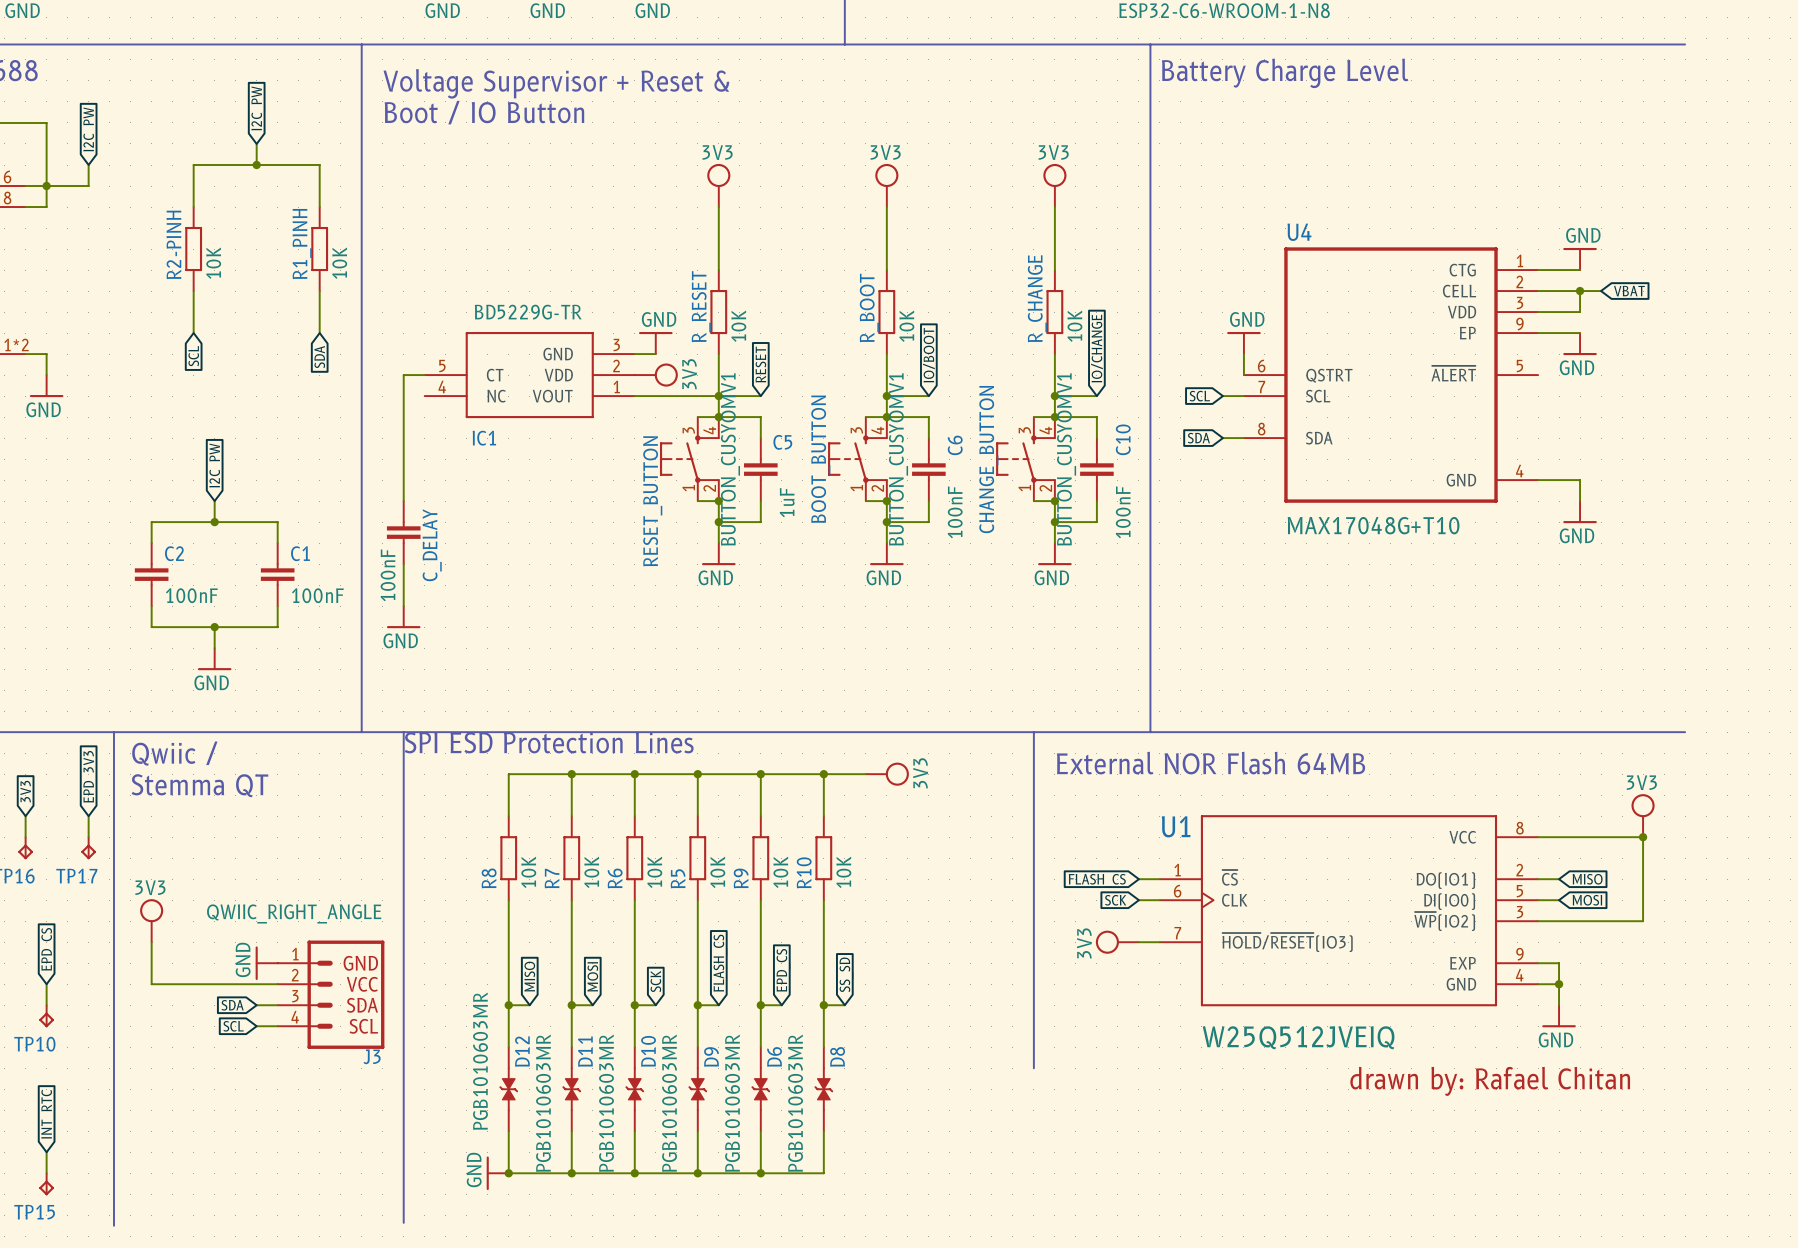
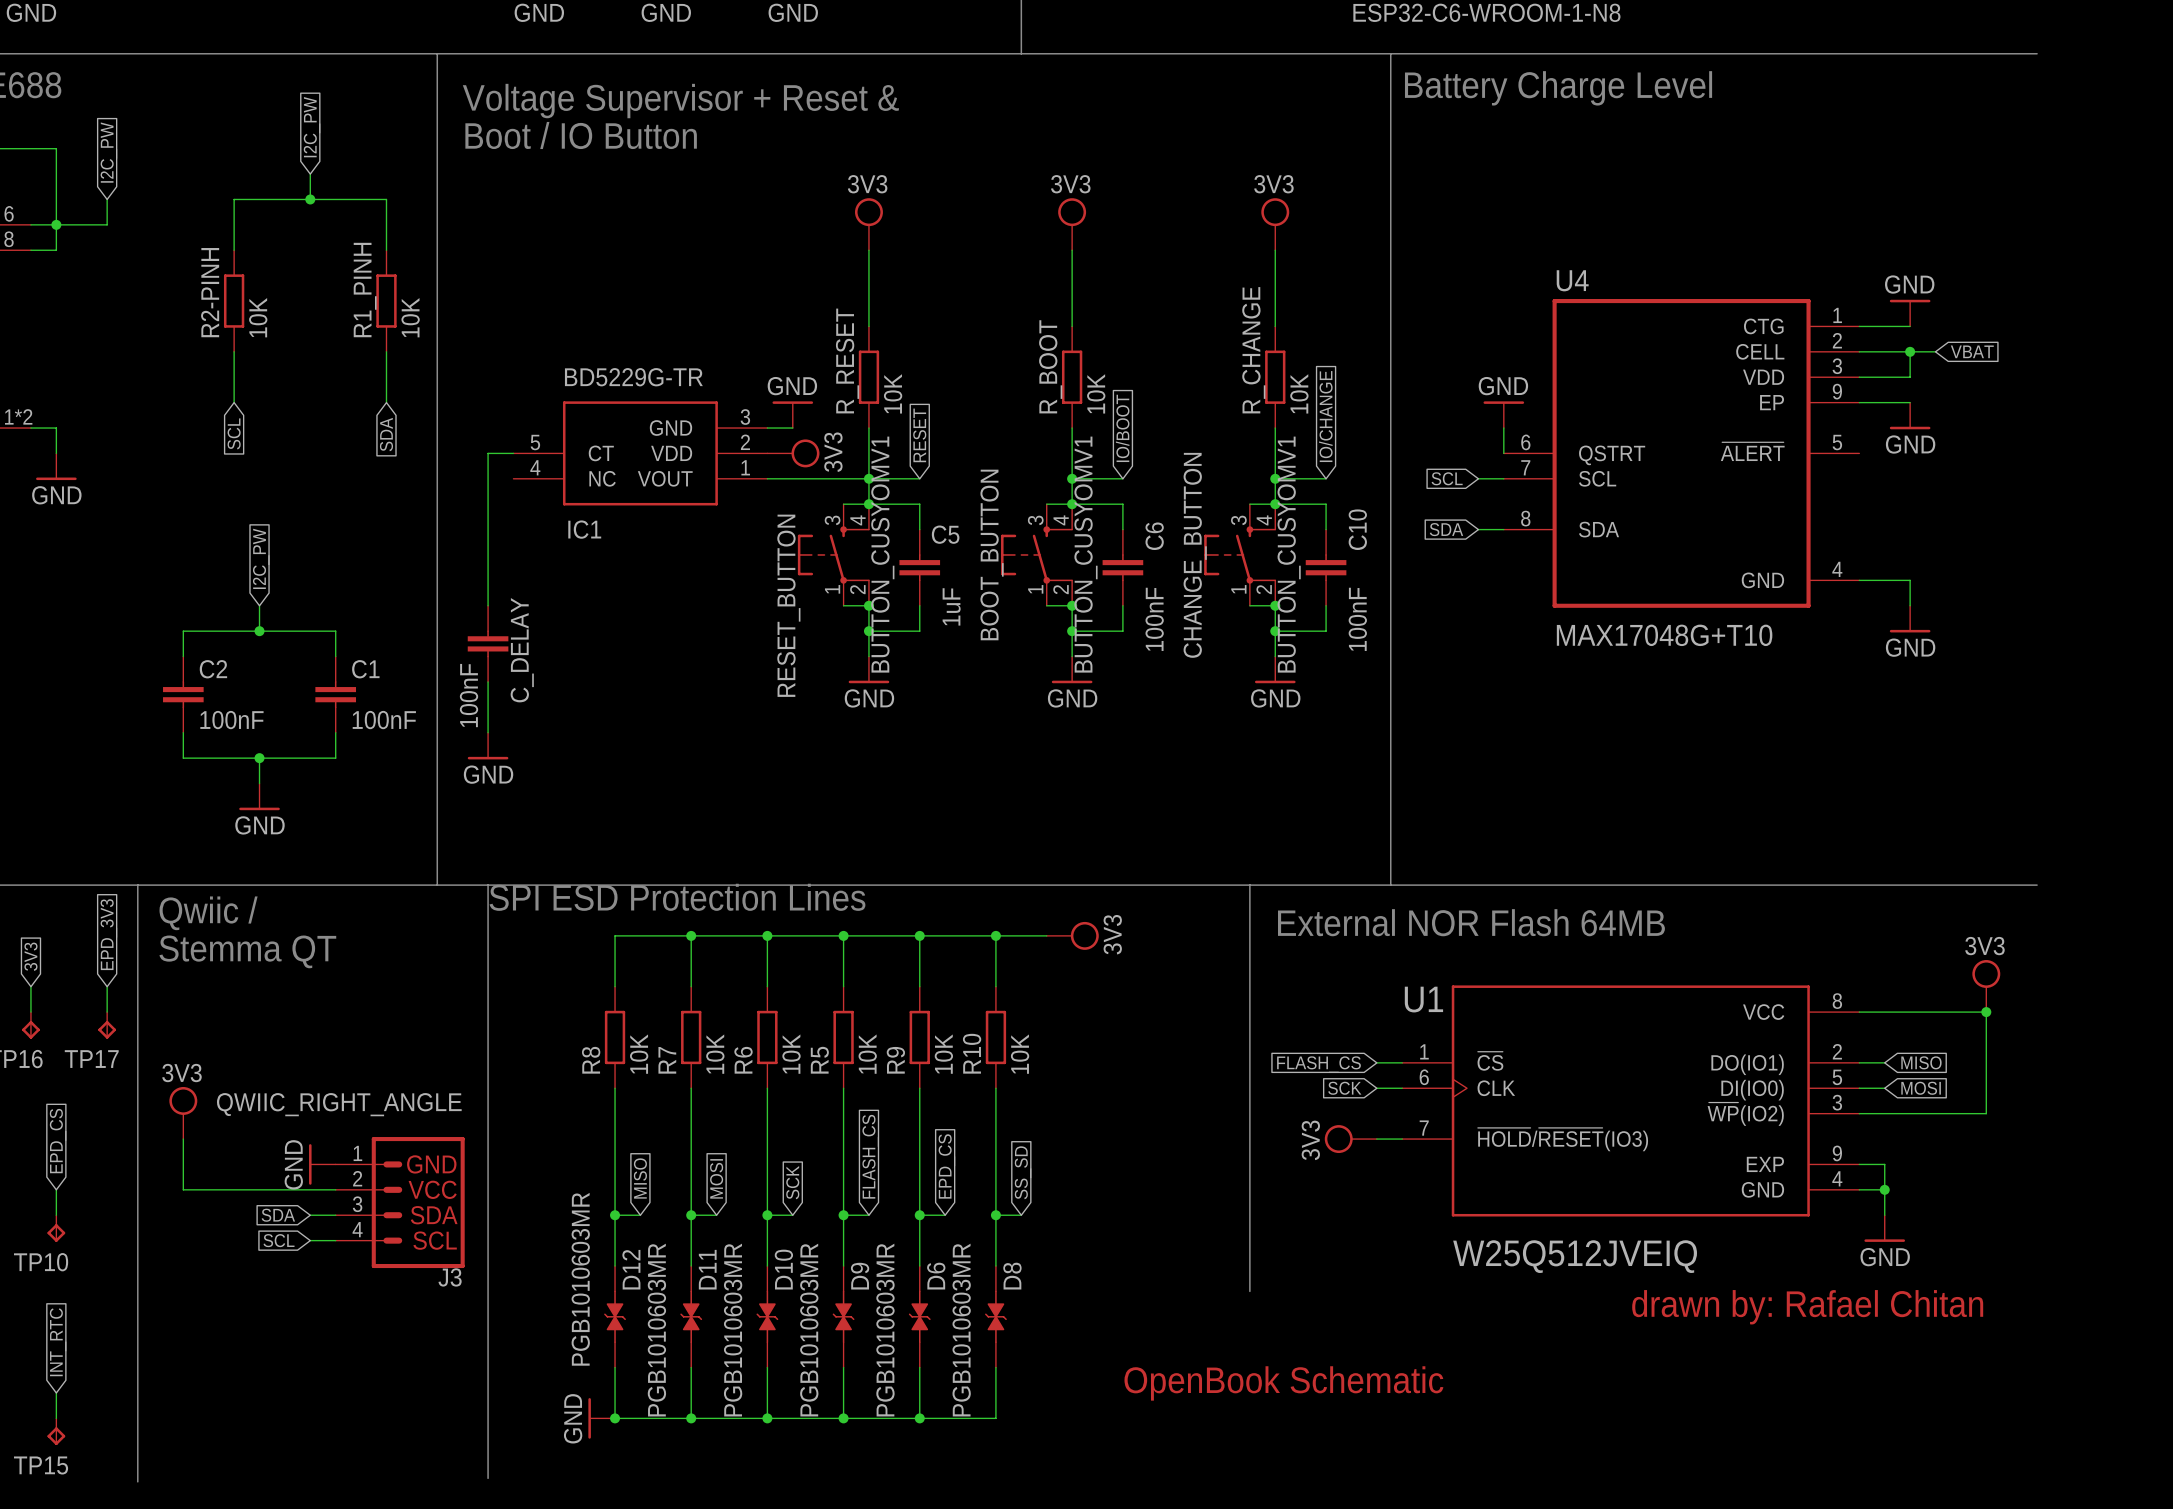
text: none -> OpenBook Schematic (1283, 1383)

